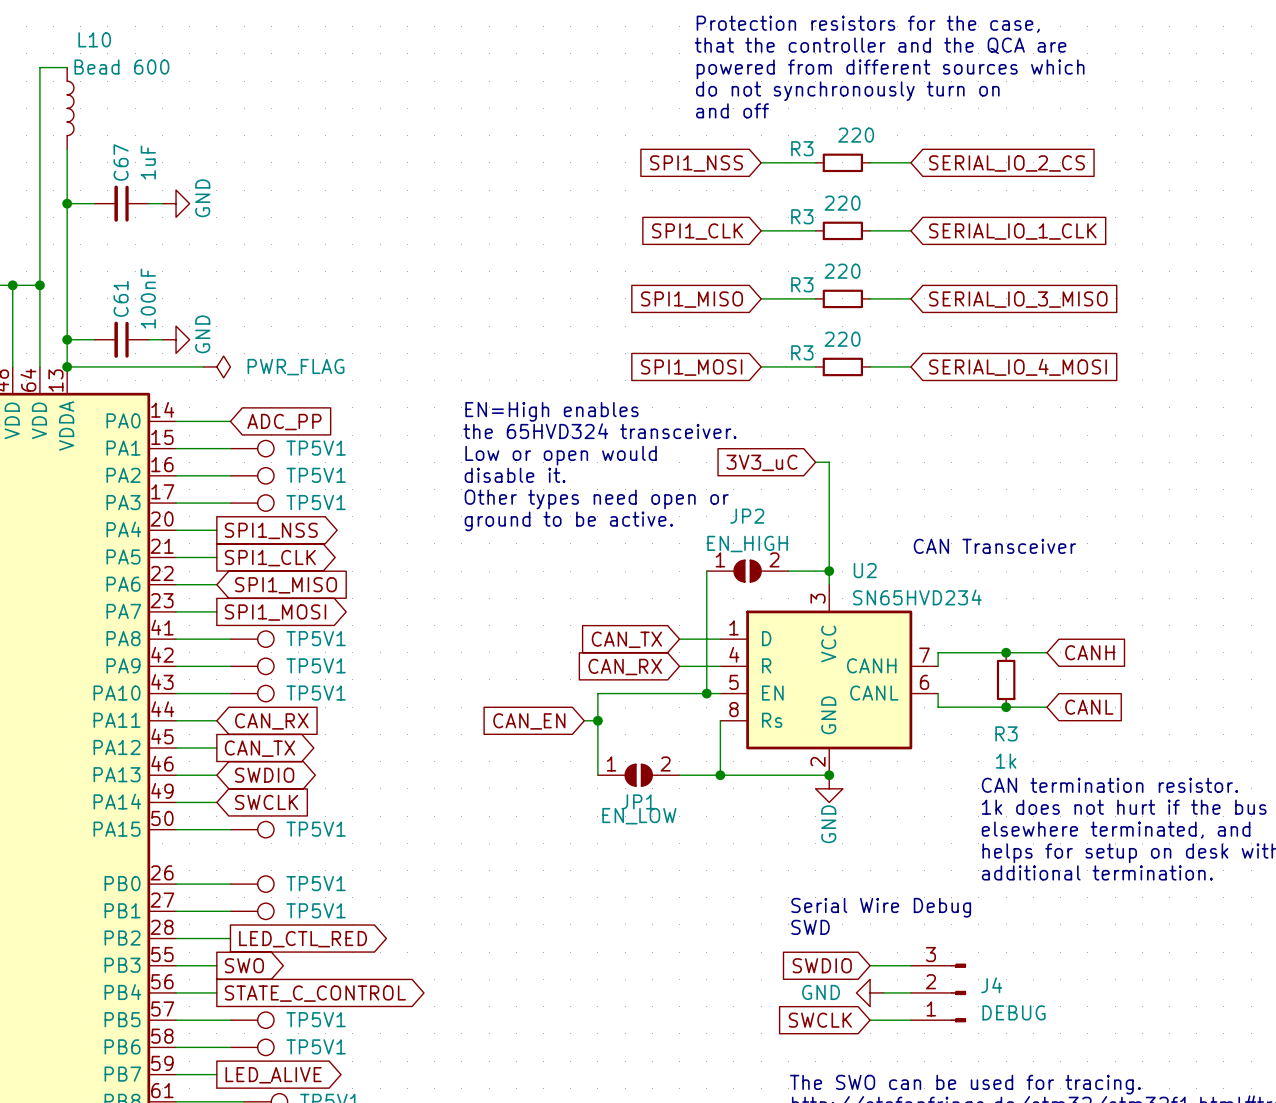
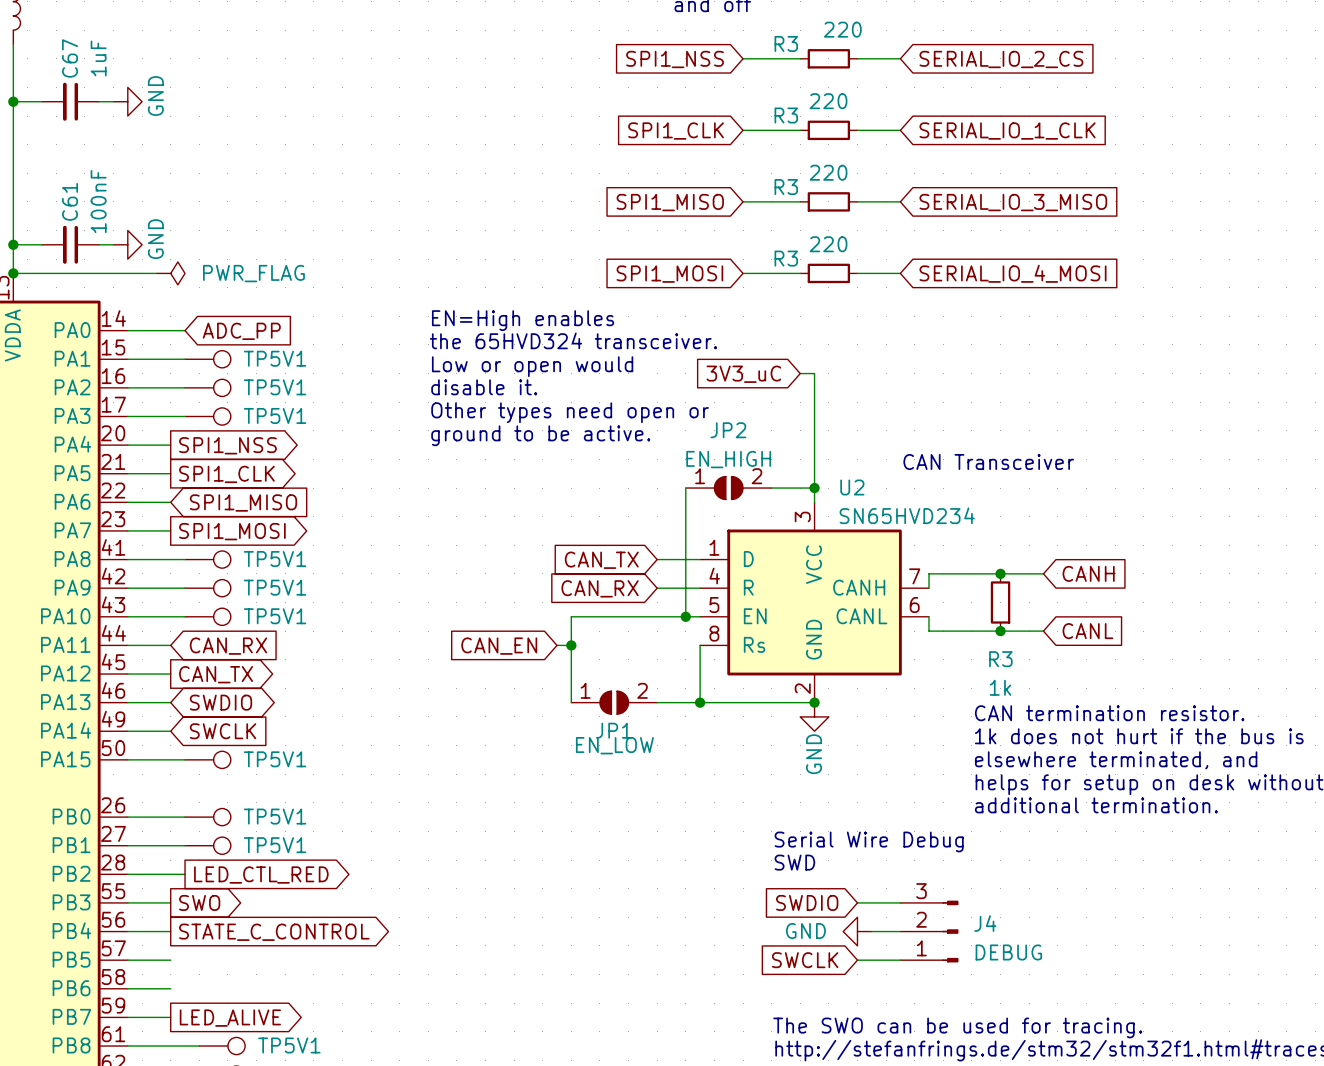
wire: (216, 1020) (230, 1020) -> none
TP5V1: (252, 1020) -> none
wire: (216, 1047) (230, 1047) -> none
TP5V1: (252, 1047) -> none

